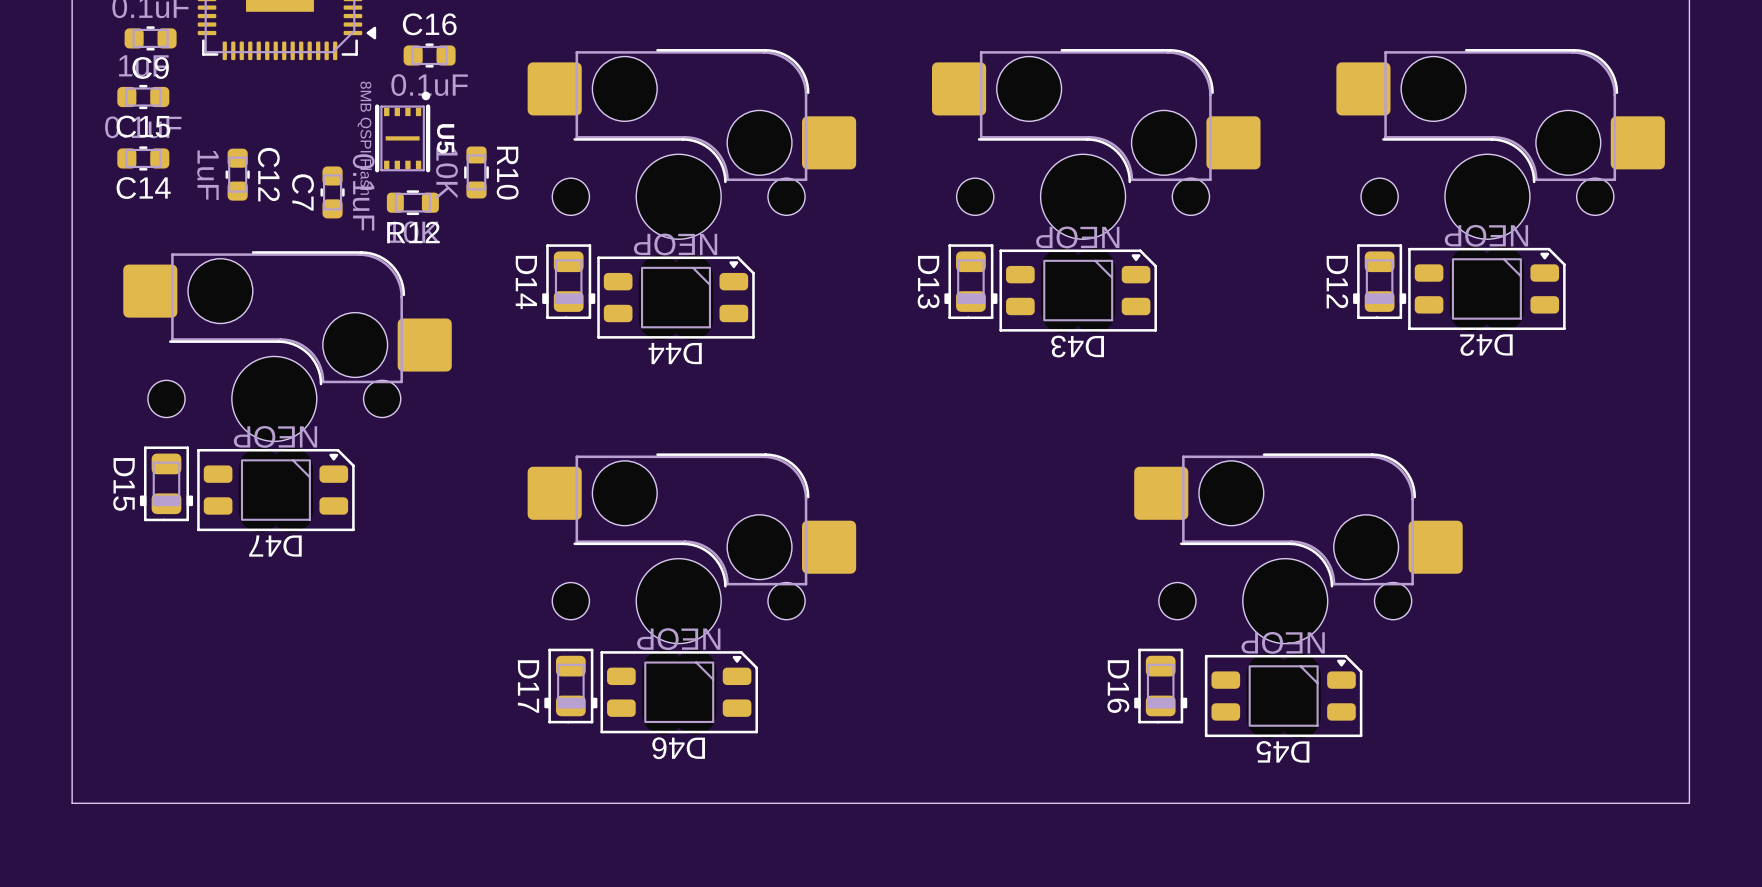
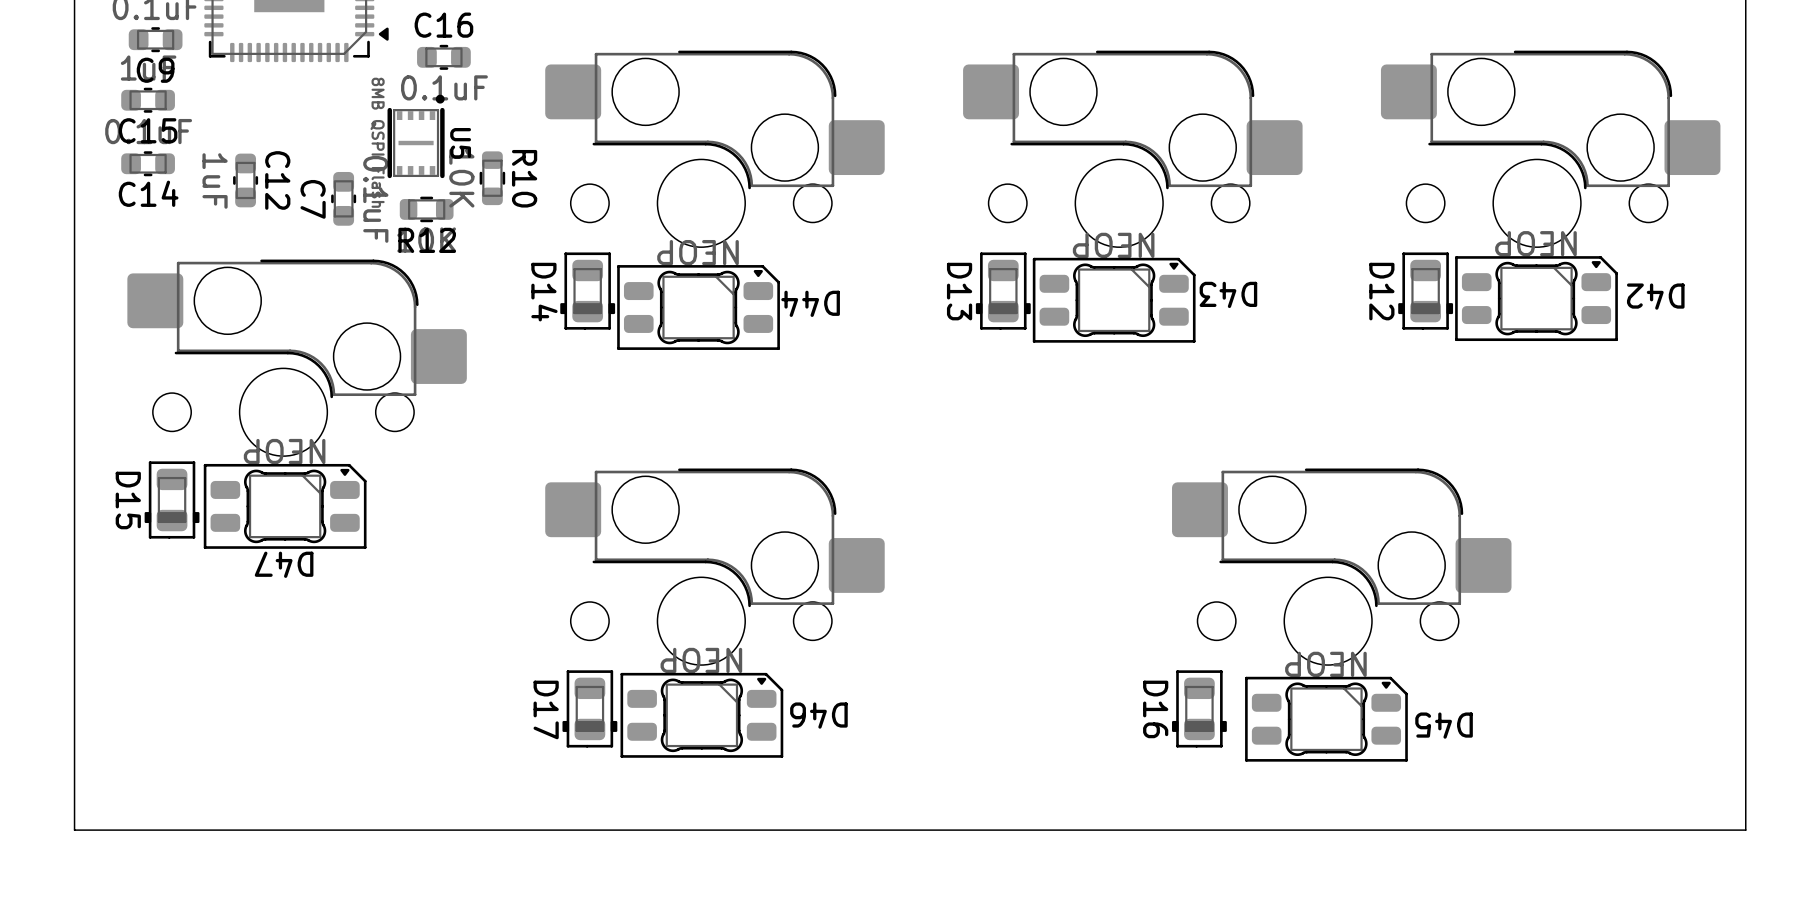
D42 footprint: [1408, 246, 1566, 332] -> [1455, 256, 1618, 342]
D43 footprint: [999, 248, 1157, 334] -> [1032, 257, 1196, 343]
D44 footprint: [597, 255, 755, 341] -> [617, 265, 780, 350]
D42 name position: D42 (1486, 345) -> D42 (1655, 296)
D43 name position: D43 (1077, 346) -> D43 (1228, 294)
D44 name position: D44 (675, 353) -> D44 (810, 303)
D47 footprint: [197, 447, 355, 533] -> [203, 463, 367, 549]
D46 footprint: [600, 649, 758, 735] -> [620, 672, 784, 758]
D45 footprint: [1204, 653, 1363, 739] -> [1245, 676, 1408, 762]
D46 name position: D46 (678, 748) -> D46 (818, 715)
D45 name position: D45 (1283, 751) -> D45 (1444, 725)

